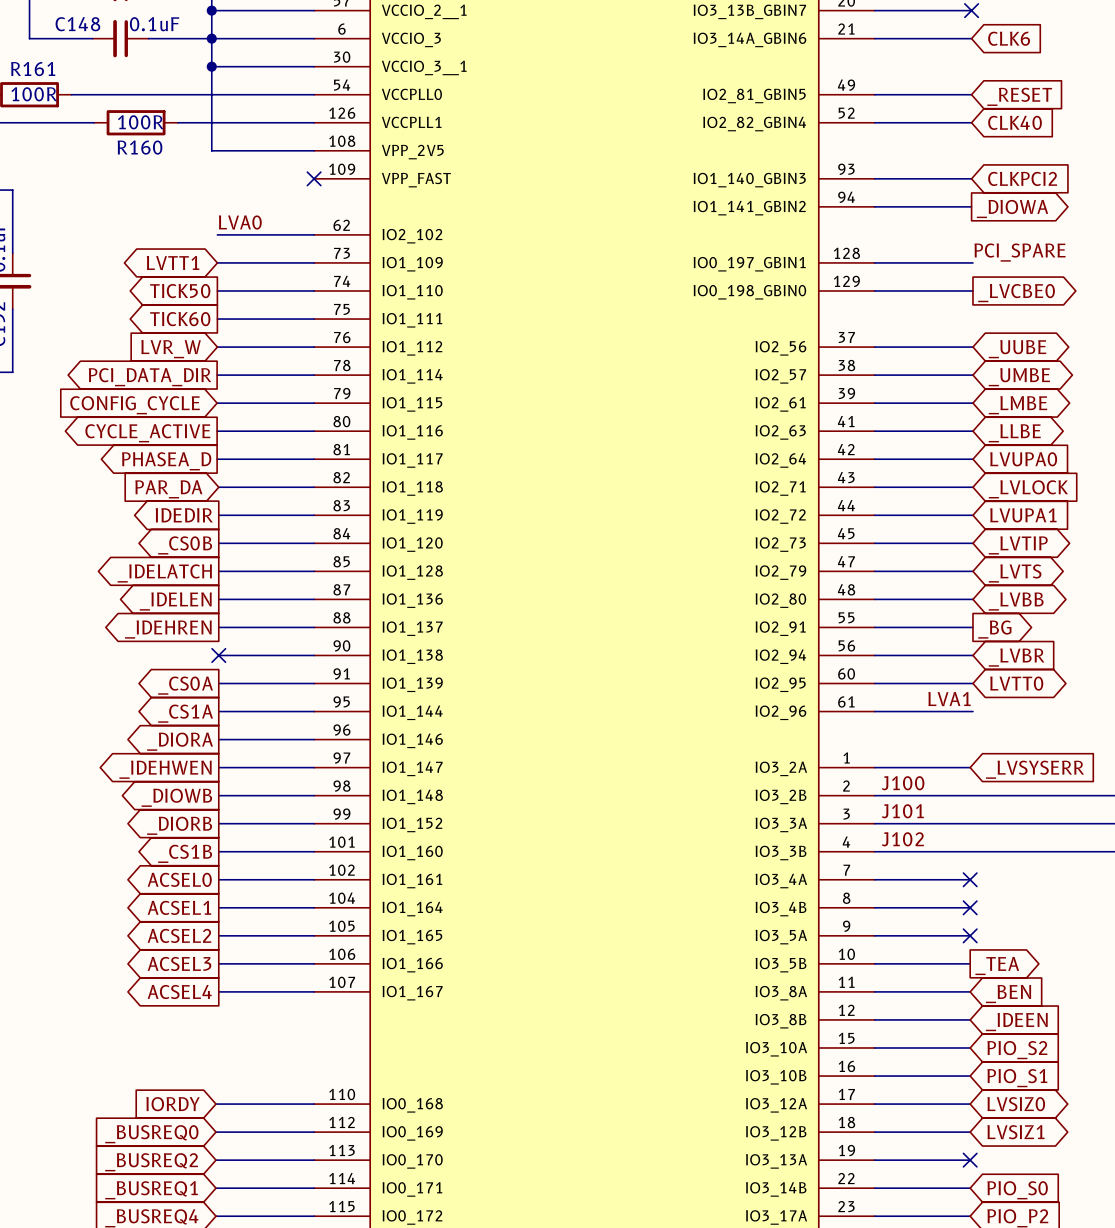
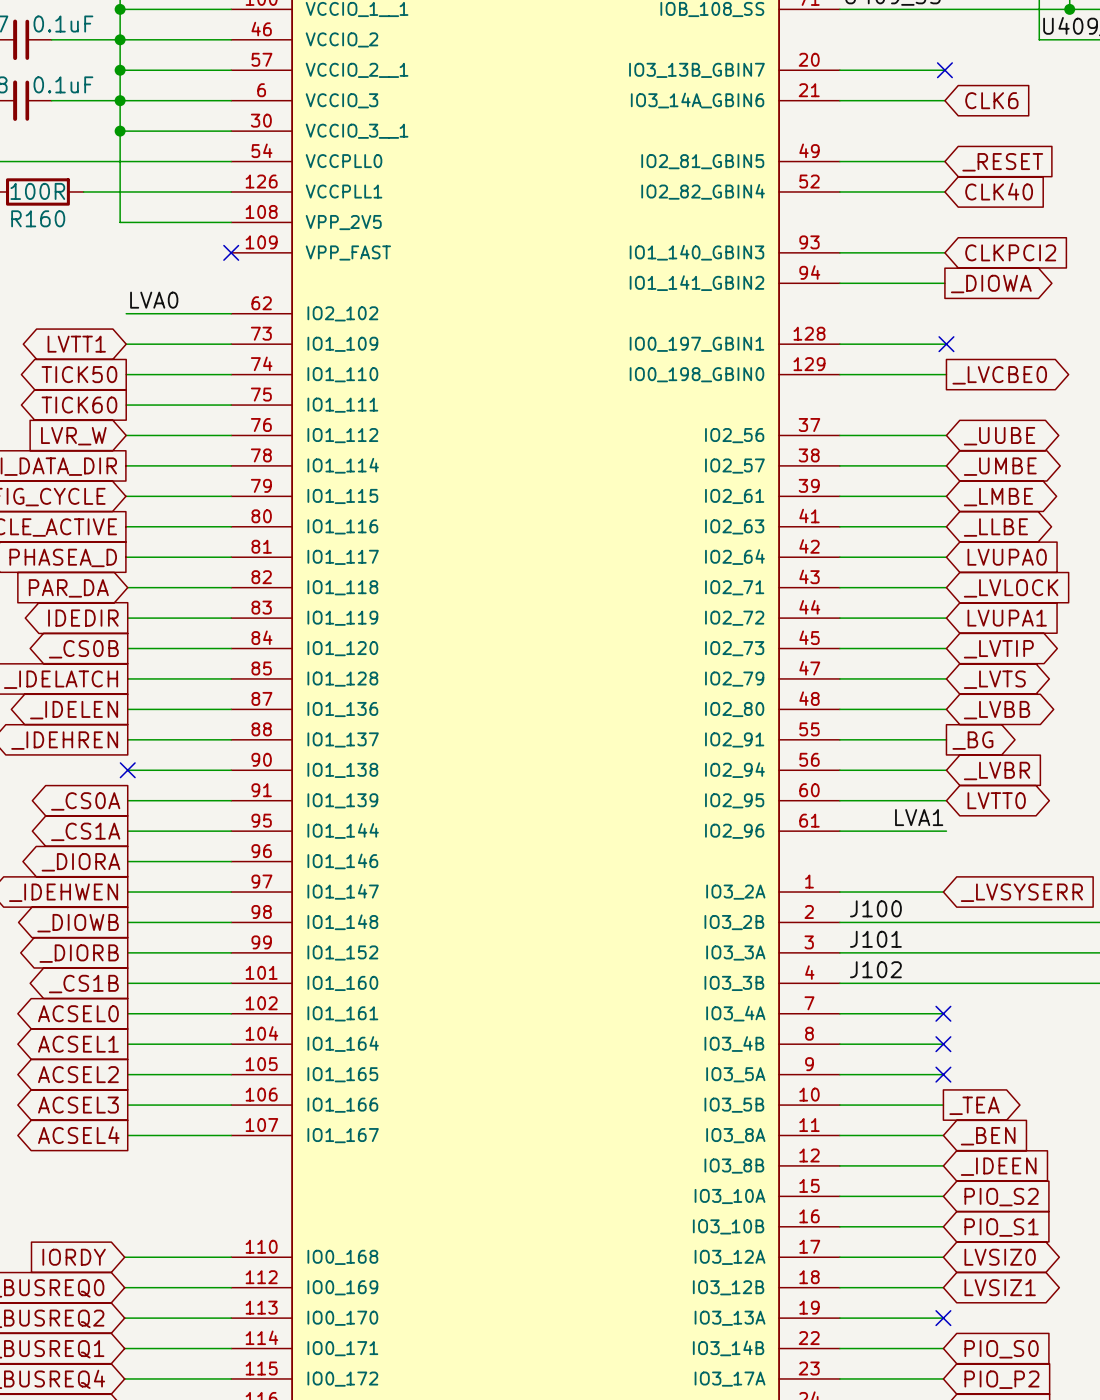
label: PCI_SPARE (1020, 252) -> none
no-connect mark: none -> (946, 344)

